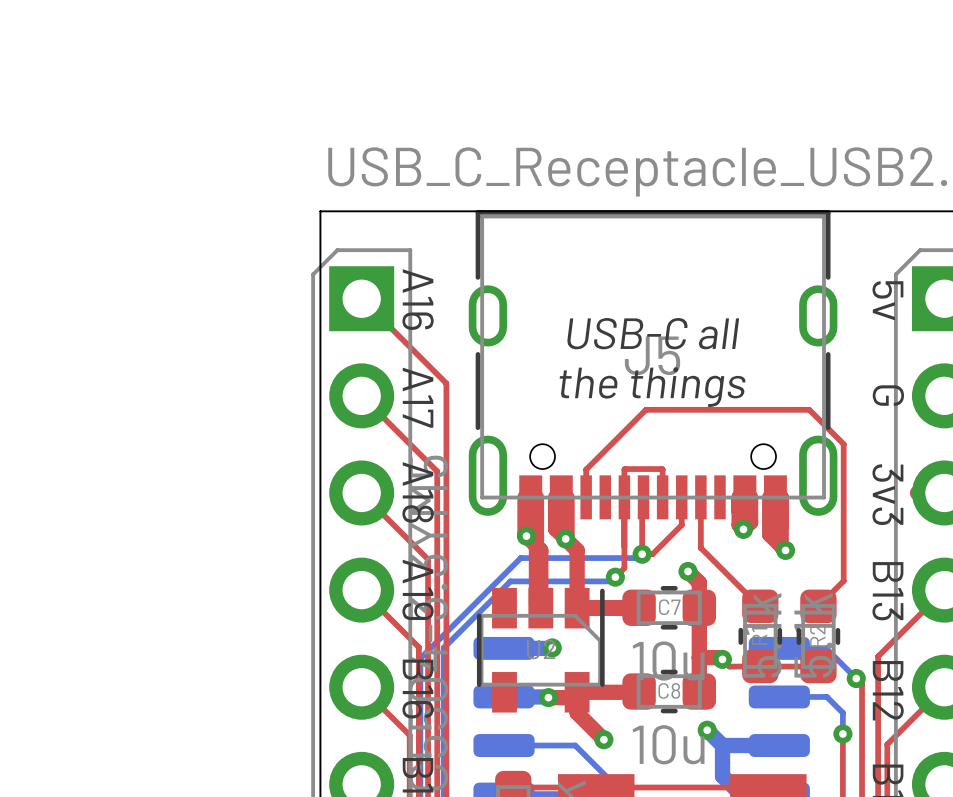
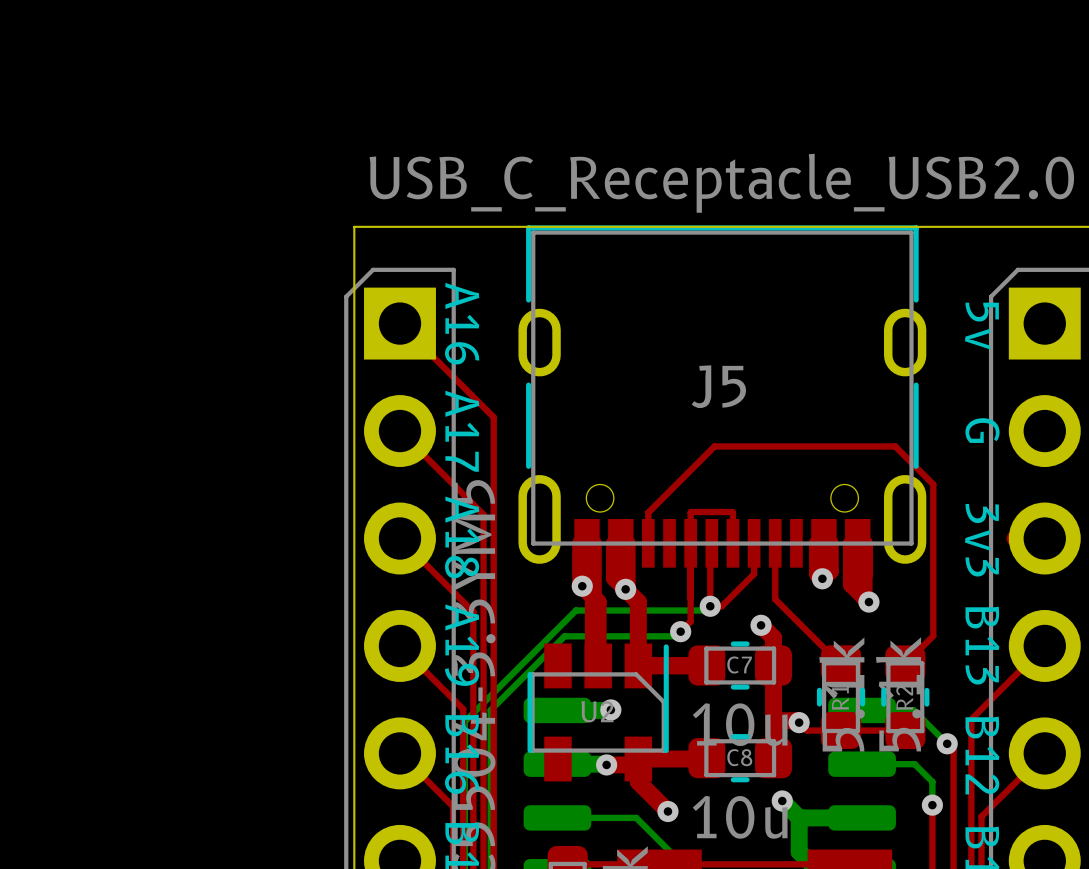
text: USB-C all (653, 333) -> none
text: the things (652, 387) -> none

